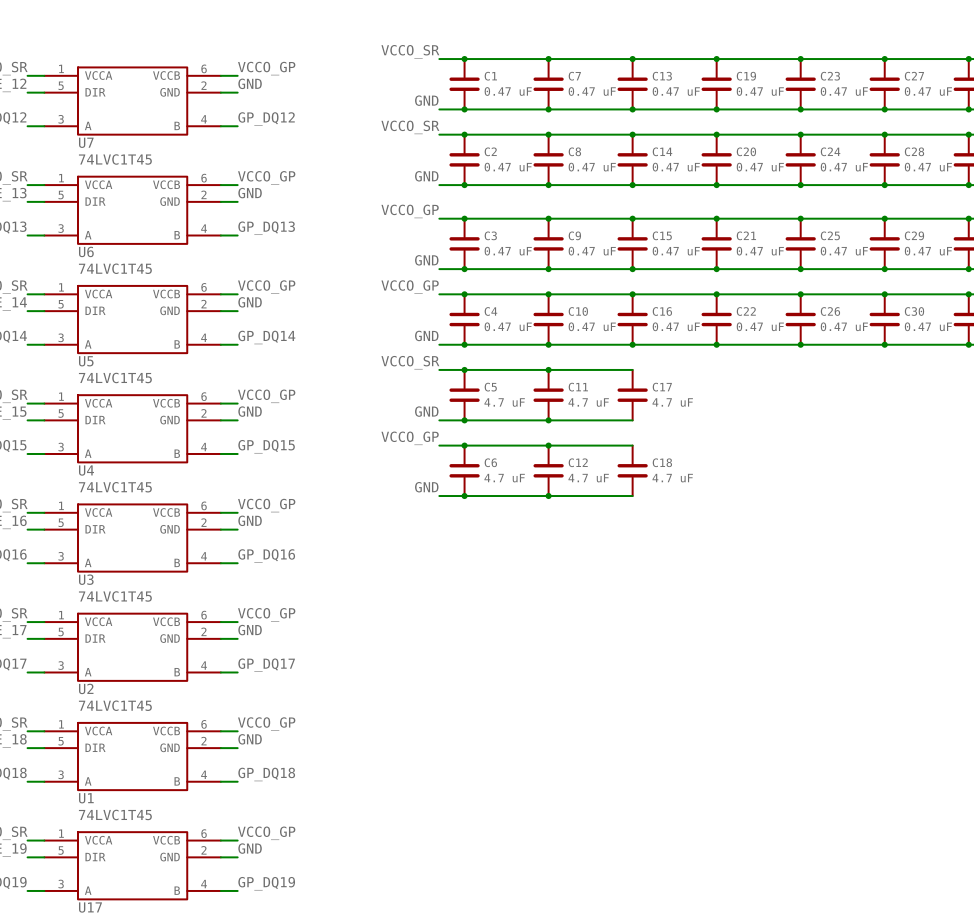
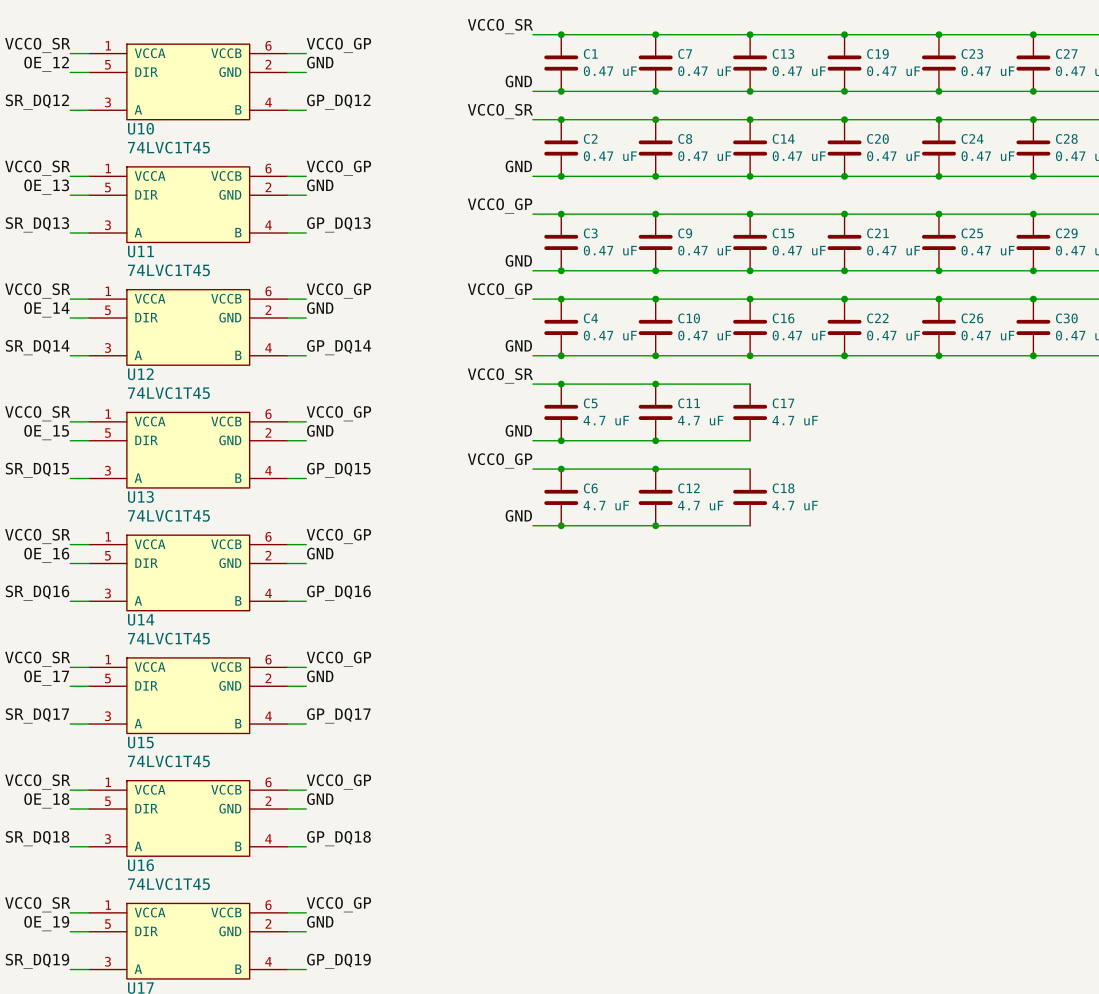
U7 name: U7 (86, 142) -> U10 (140, 128)
U6 name: U6 (86, 251) -> U11 (140, 251)
U5 name: U5 (86, 361) -> U12 (140, 374)
U4 name: U4 (86, 470) -> U13 (140, 496)
U3 name: U3 (86, 579) -> U14 (141, 619)
U2 name: U2 (86, 688) -> U15 (140, 742)
U1 name: U1 (86, 798) -> U16 (140, 865)

